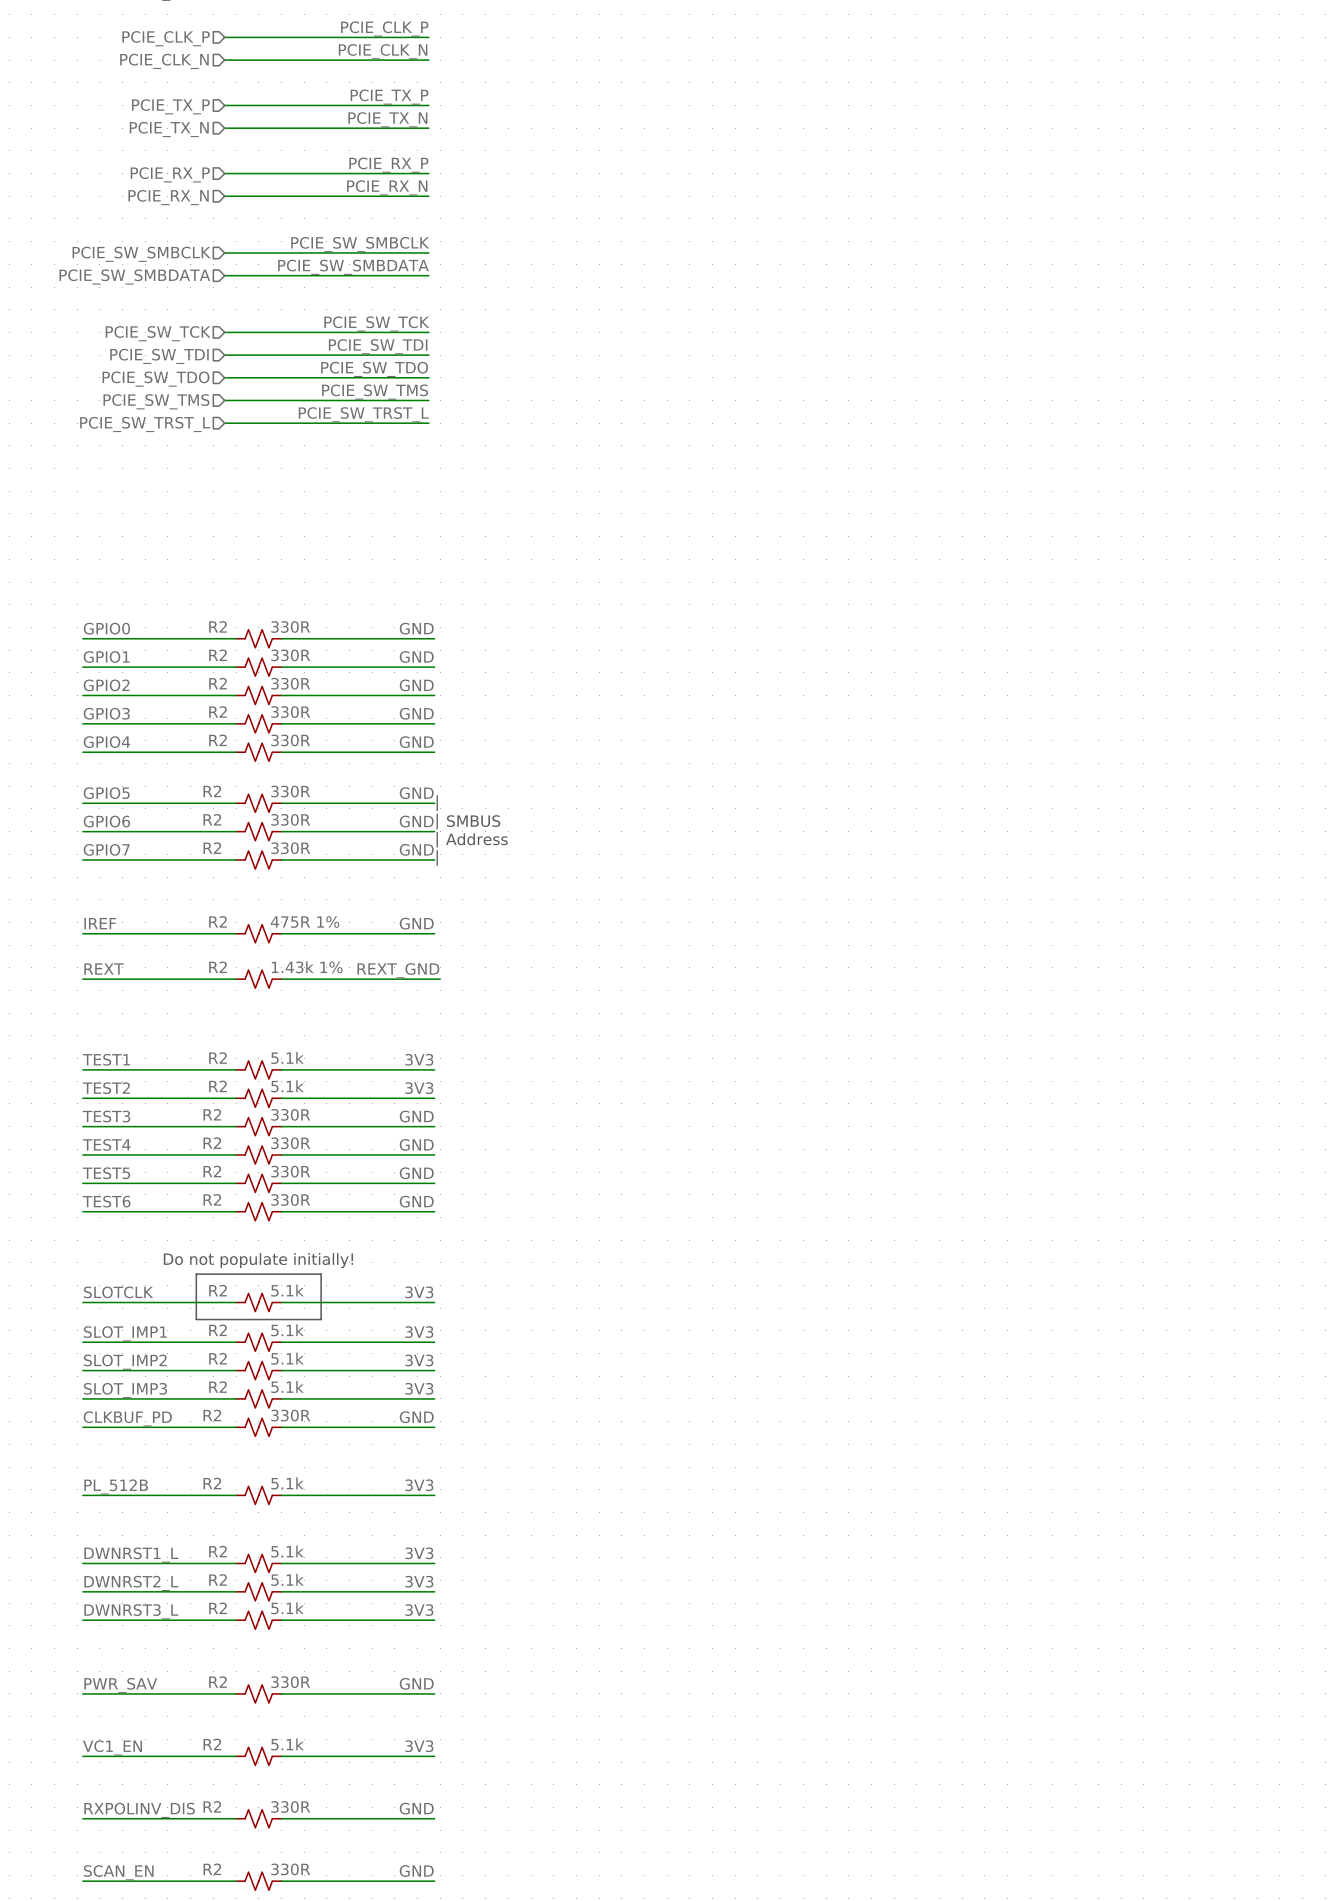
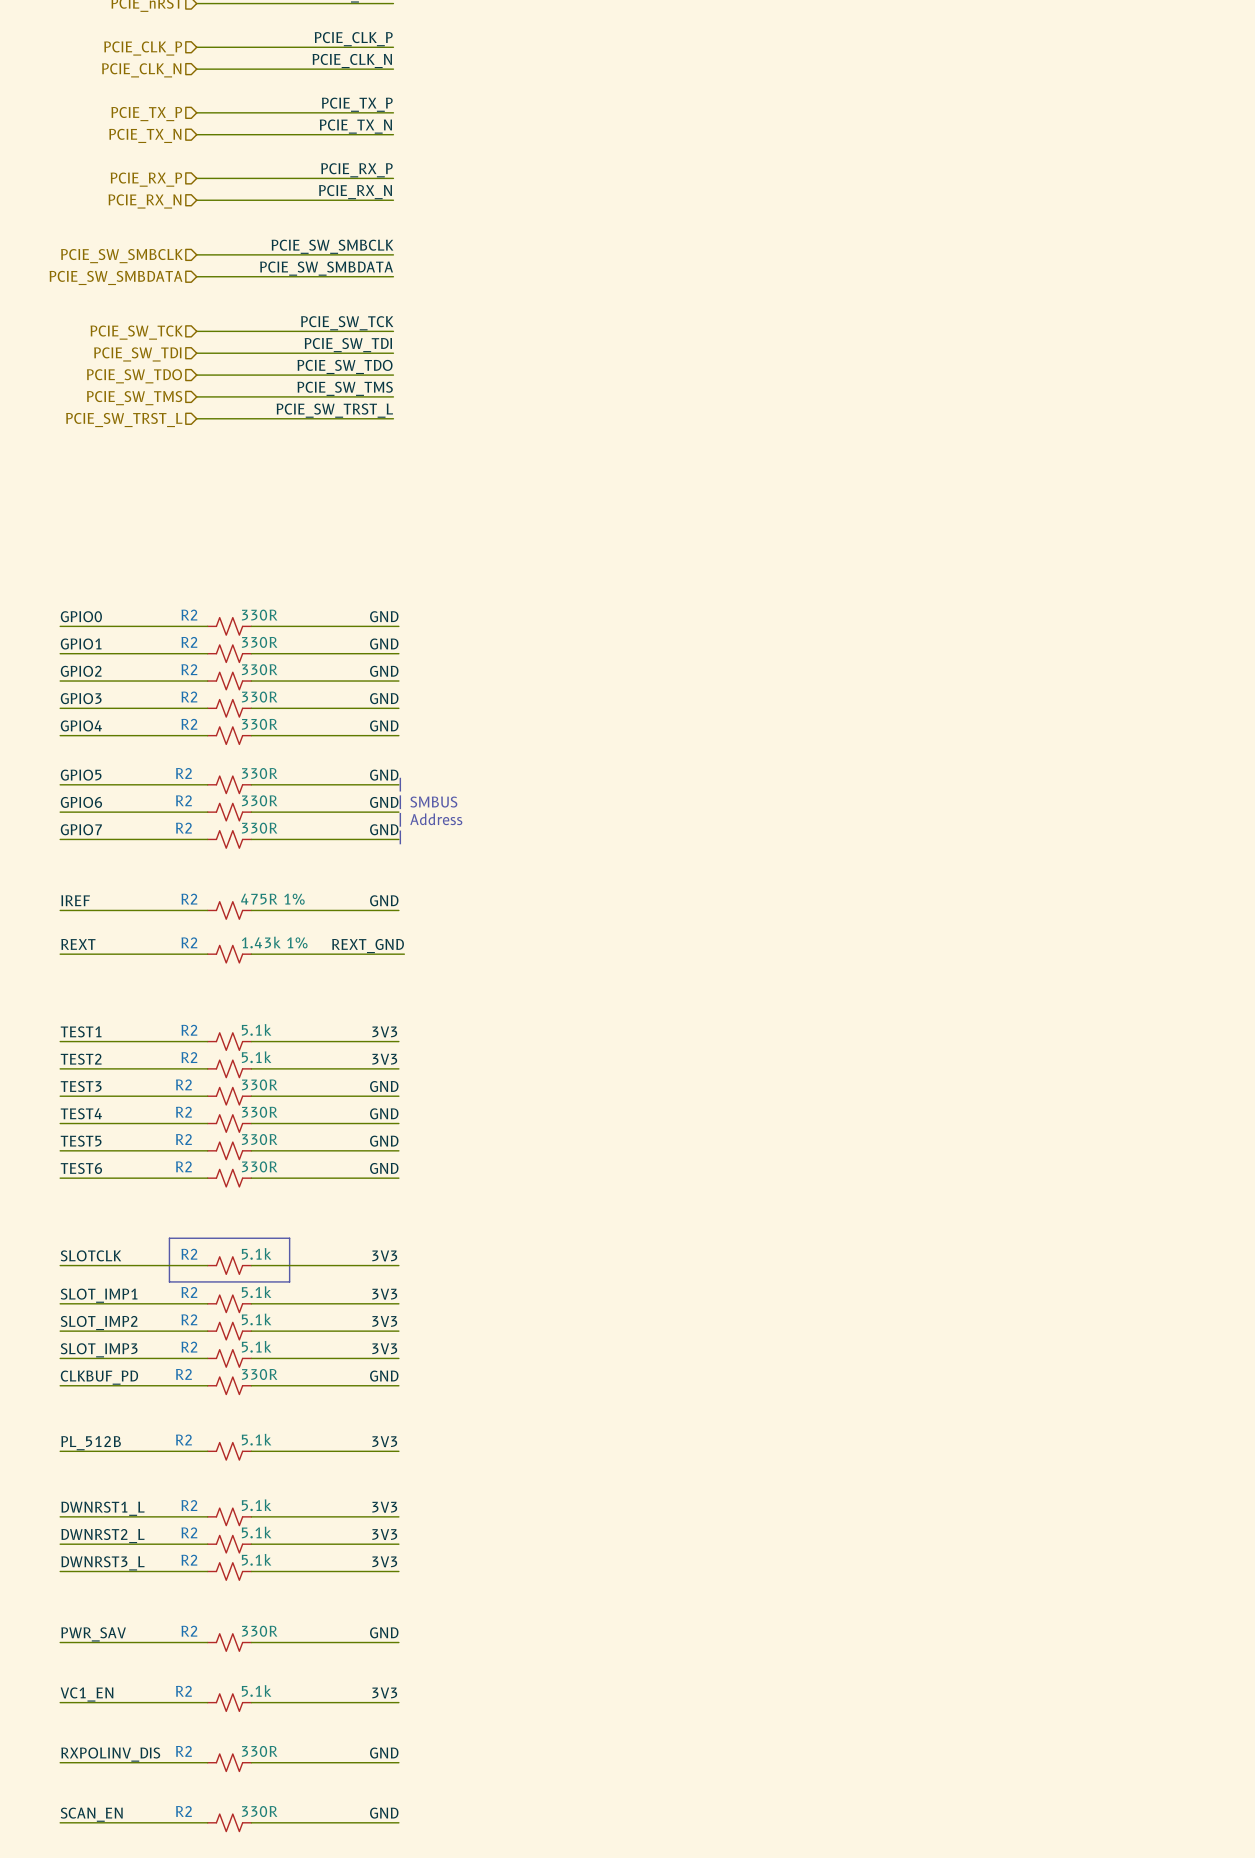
text: Do not populate initially! (258, 1260) -> none

